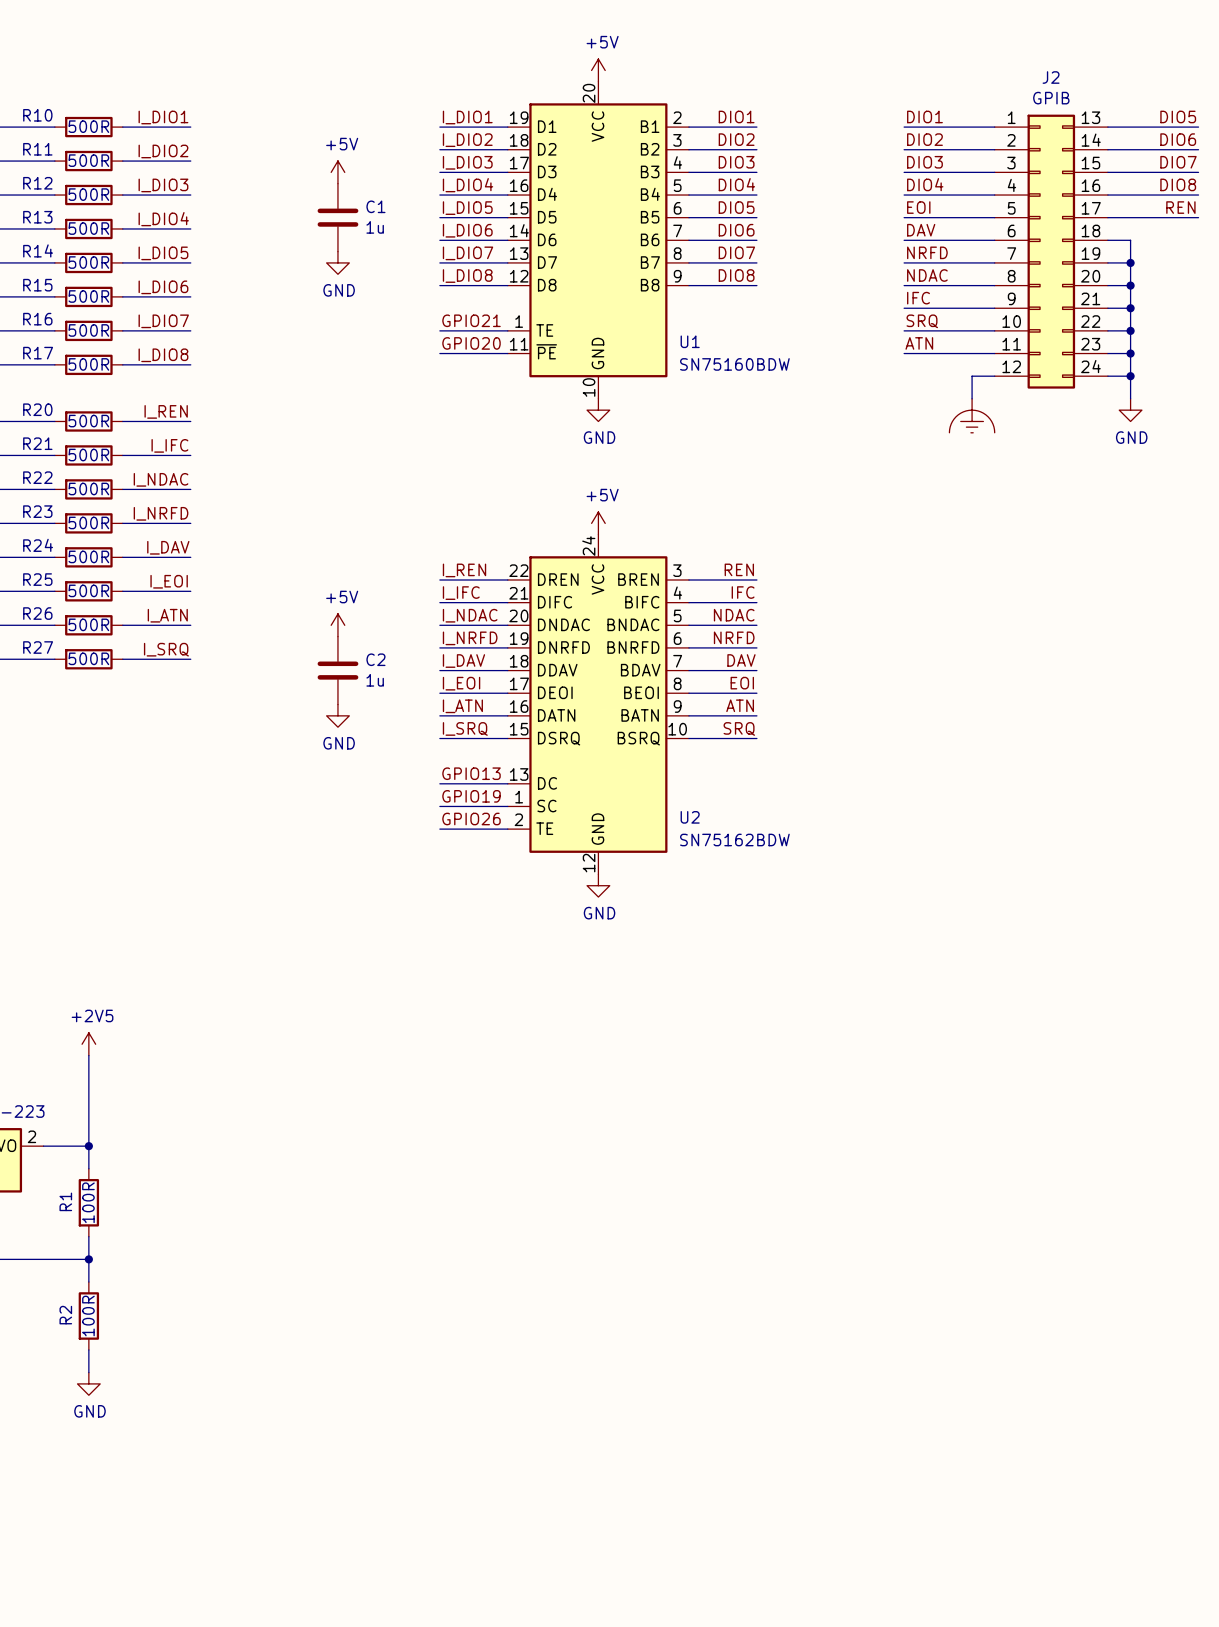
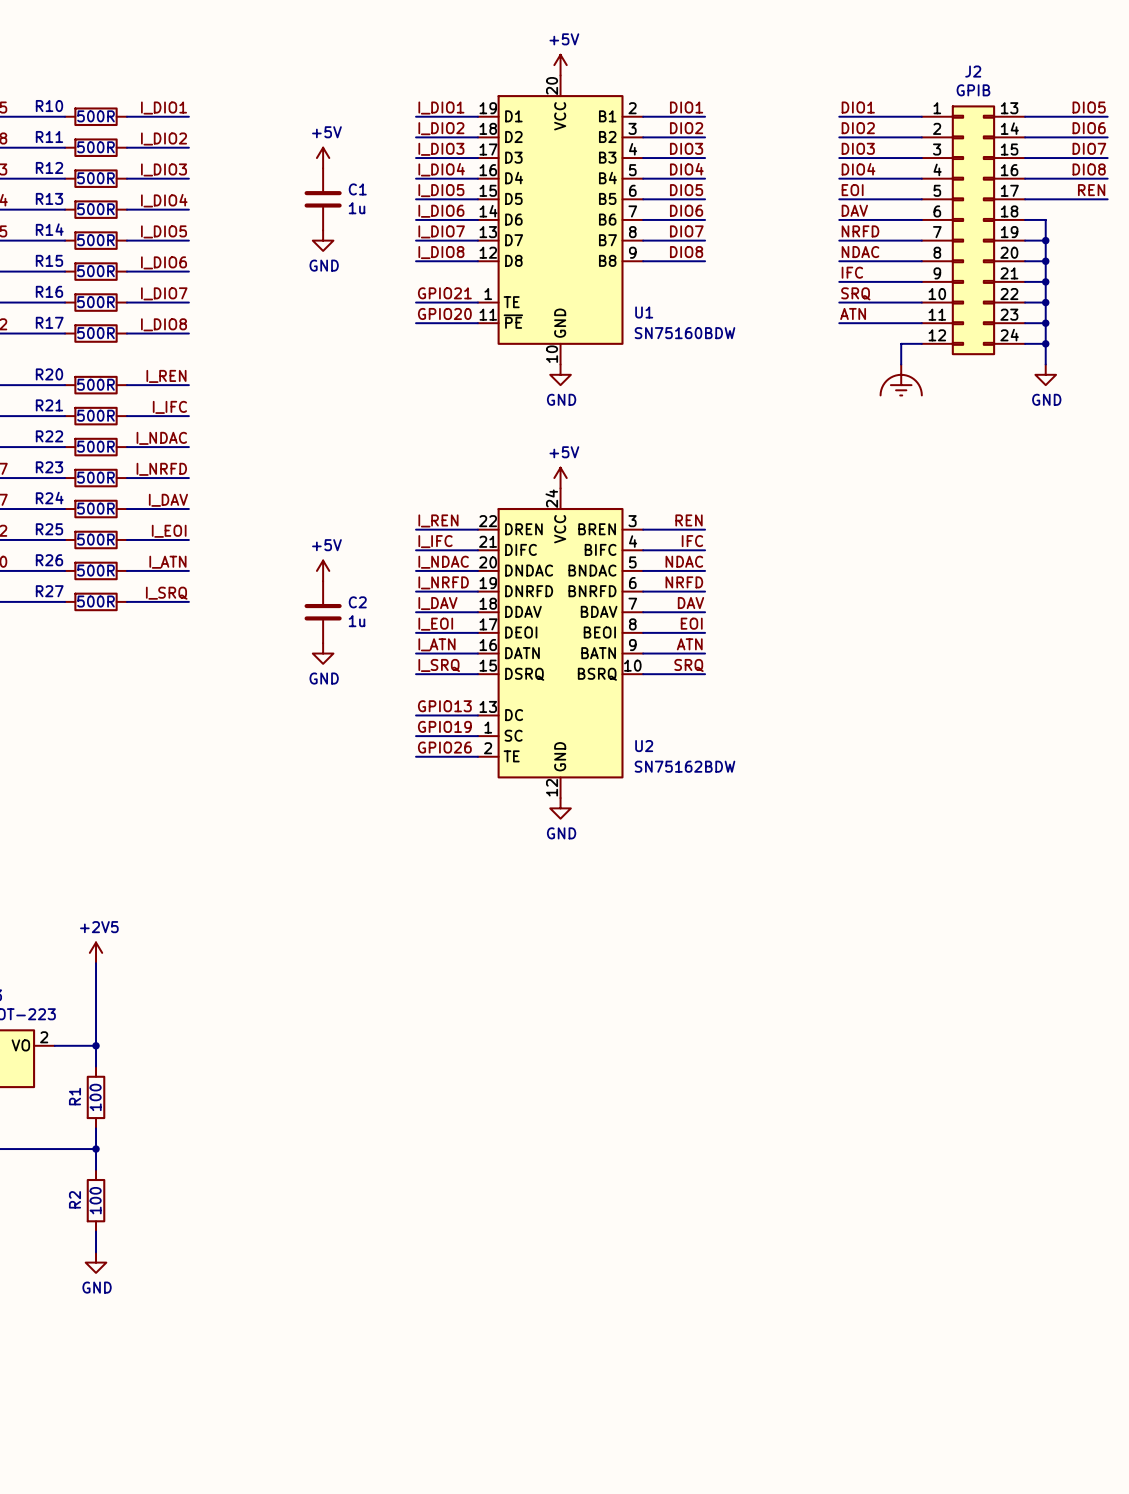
R1 value: 100R (88, 1202) -> 100 (95, 1097)
R2 value: 100R (88, 1315) -> 100 (95, 1200)

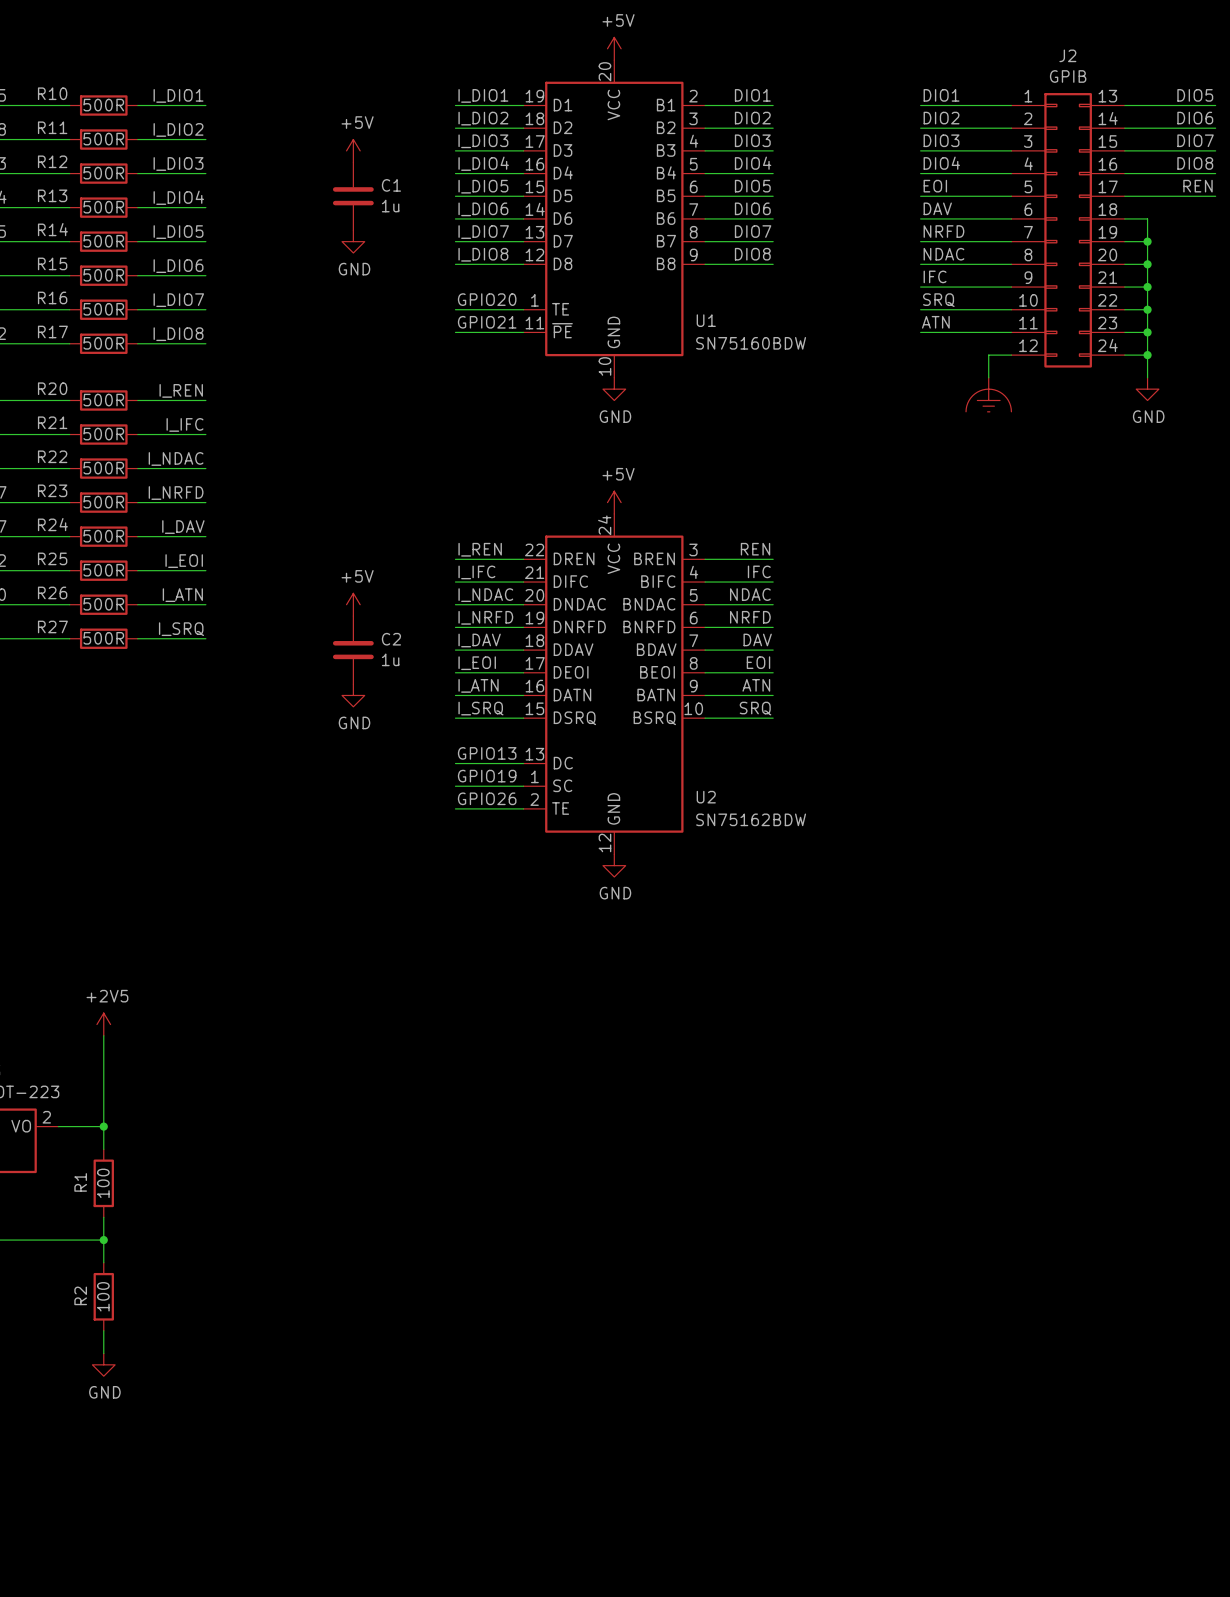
label: GPIO21 (444, 293) -> GPIO20 (487, 299)
label: GPIO20 (444, 313) -> GPIO21 (487, 322)

